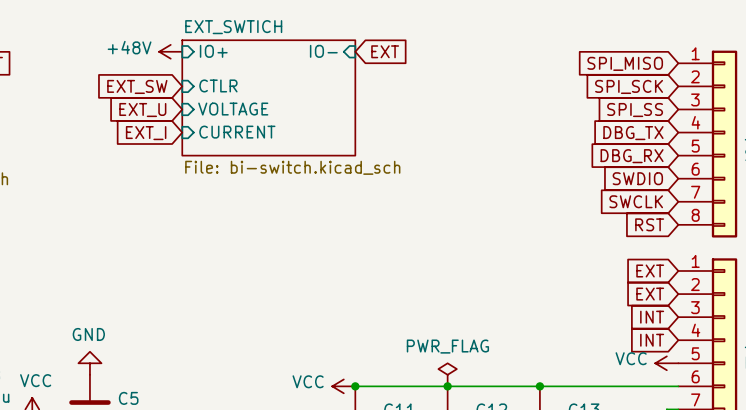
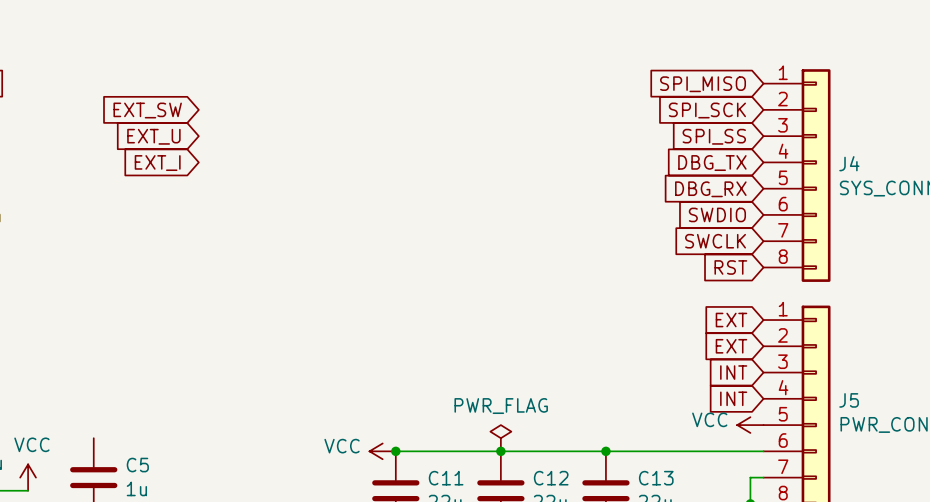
power symbol: +48V (170, 51) -> none
sheet pin: IO+ (213, 51) -> none
sheet pin: IO- (323, 51) -> none
global label: EXT (385, 51) -> none
sheet pin: CTLR (218, 85) -> none
sheet EXT_SWTICH: File: bi-switch.kicad_sch (268, 97) -> none
sheet pin: VOLTAGE (233, 109) -> none
sheet pin: CURRENT (237, 132) -> none
power symbol: GND (89, 363) -> none

